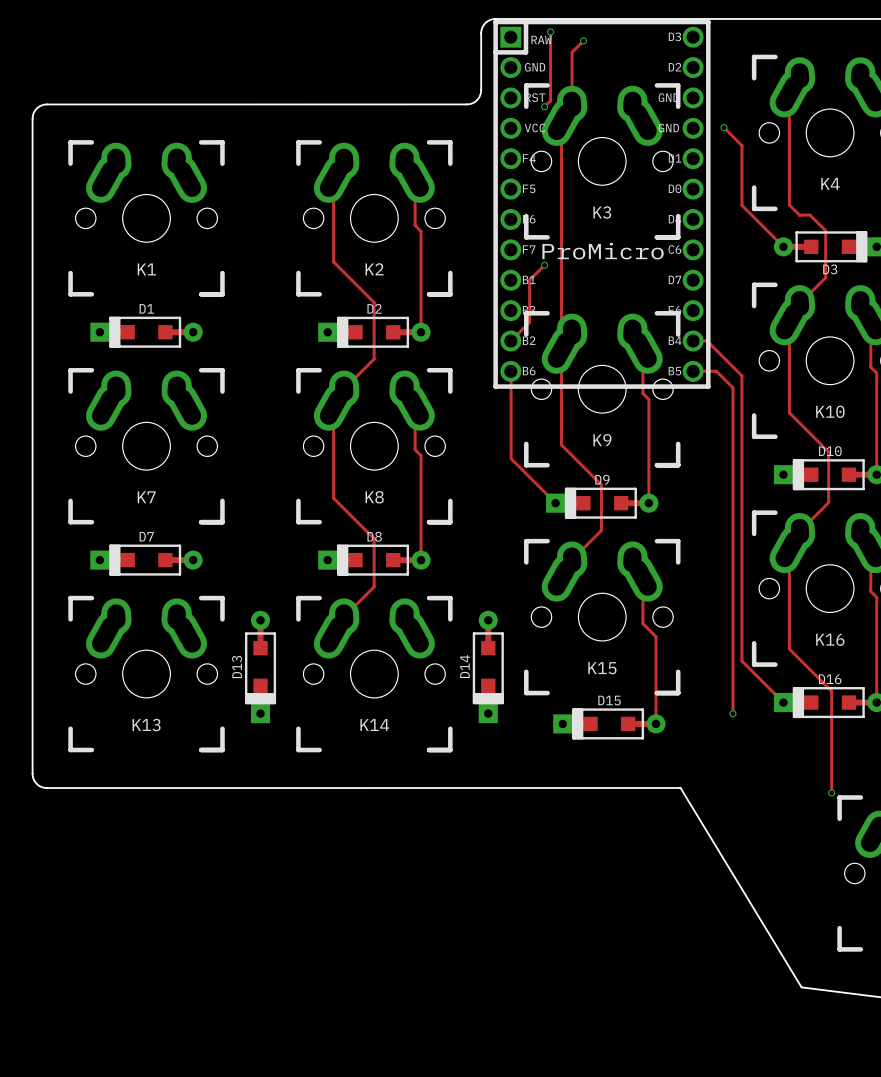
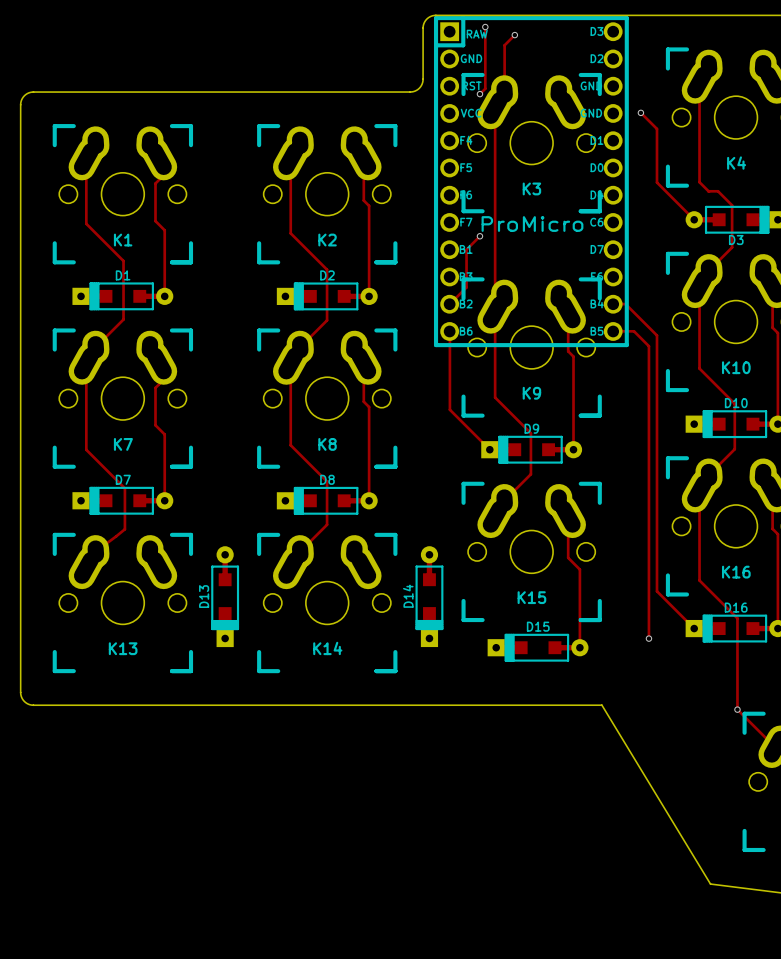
track: none -> (86, 159) (86, 223) (123, 261) (123, 319) (95, 347)
track: none -> (159, 159) (159, 179) (155, 183) (155, 221) (164, 230) (164, 296)
track: none -> (86, 363) (86, 449) (124, 488) (124, 529) (95, 551)
track: none -> (159, 363) (159, 384) (155, 387) (155, 425) (164, 434) (164, 500)
track: none -> (737, 709) (776, 746)

